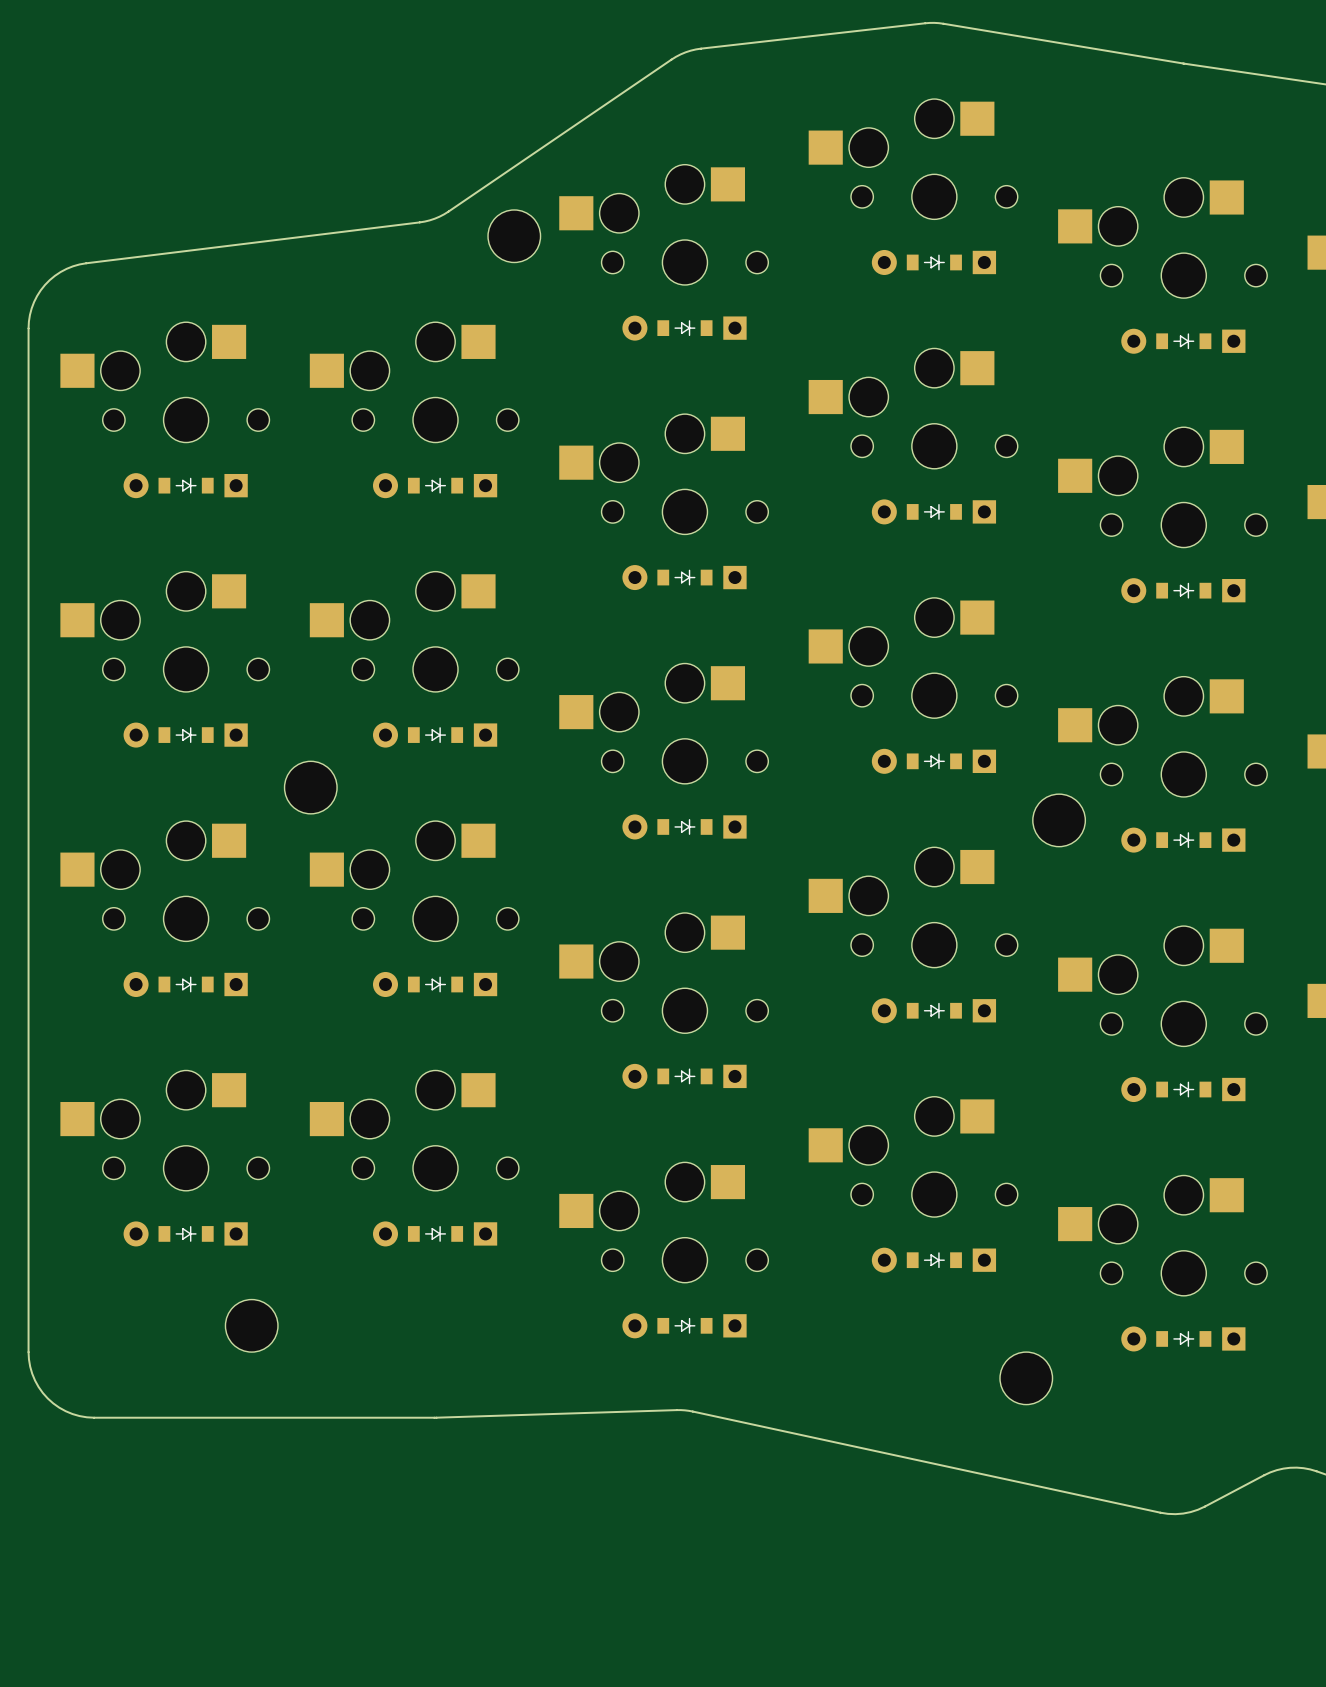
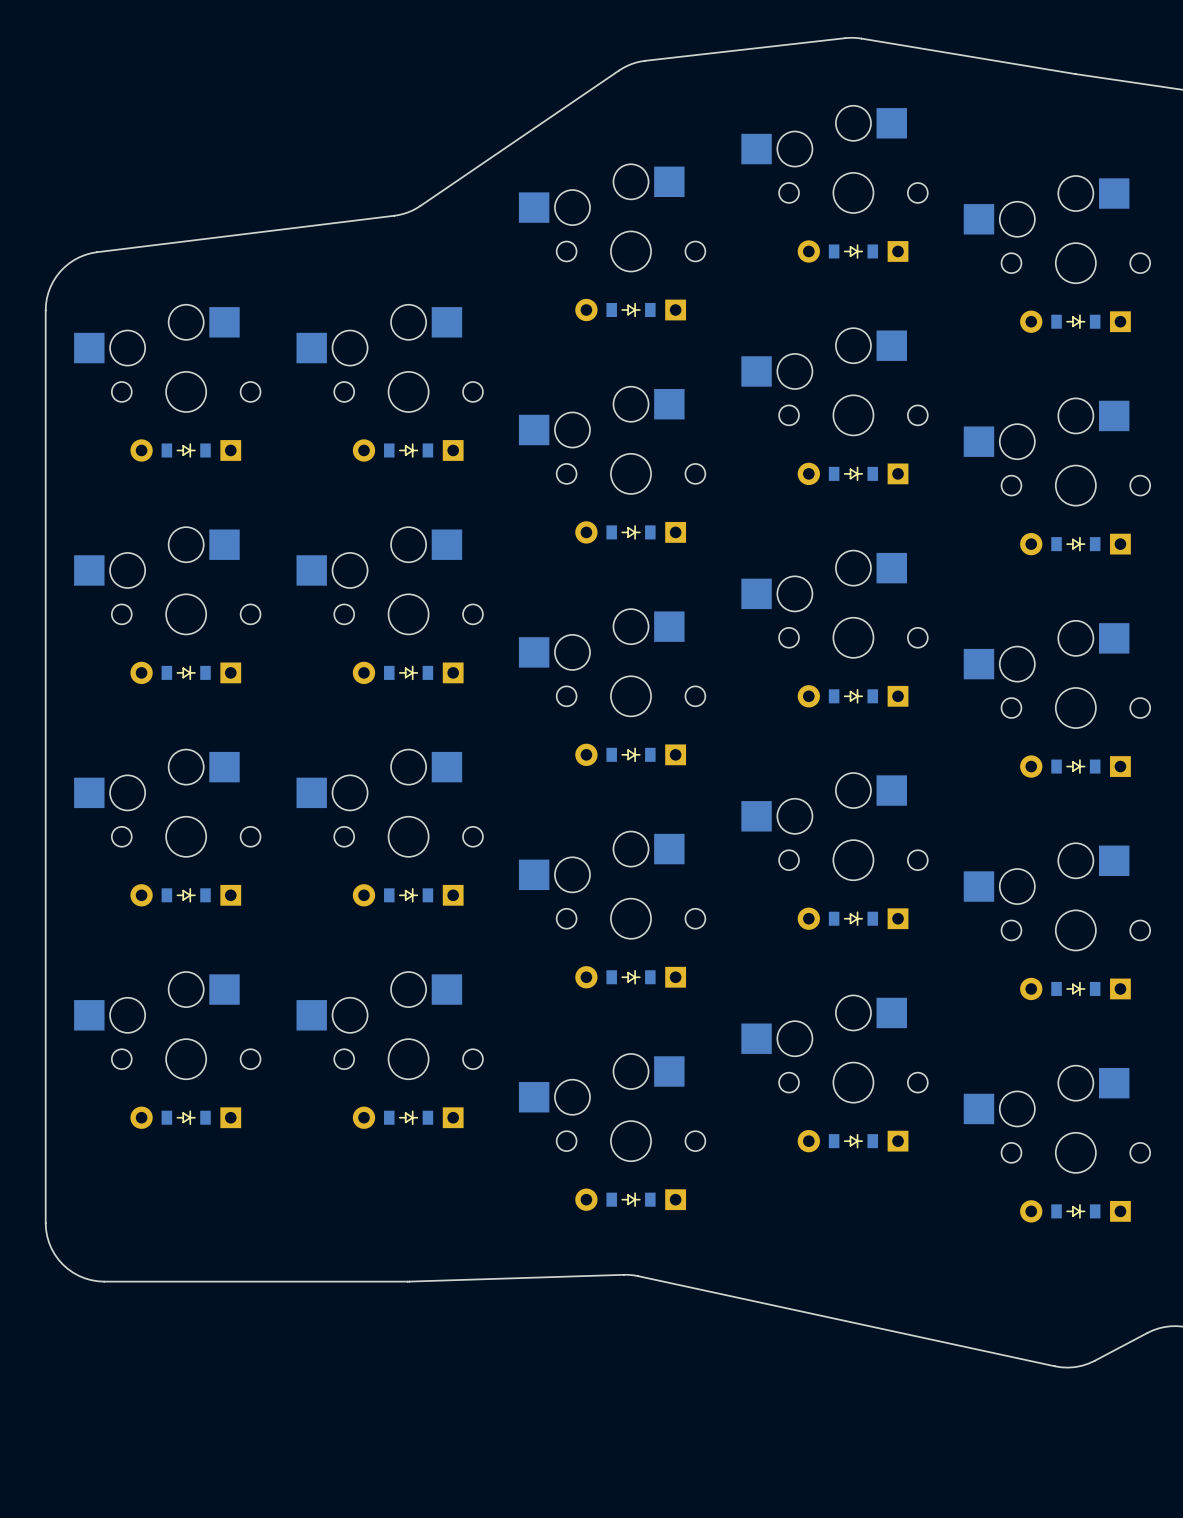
part: (514, 236) -> none
part: (310, 787) -> none
part: (1059, 820) -> none
part: (251, 1325) -> none
part: (1026, 1378) -> none

